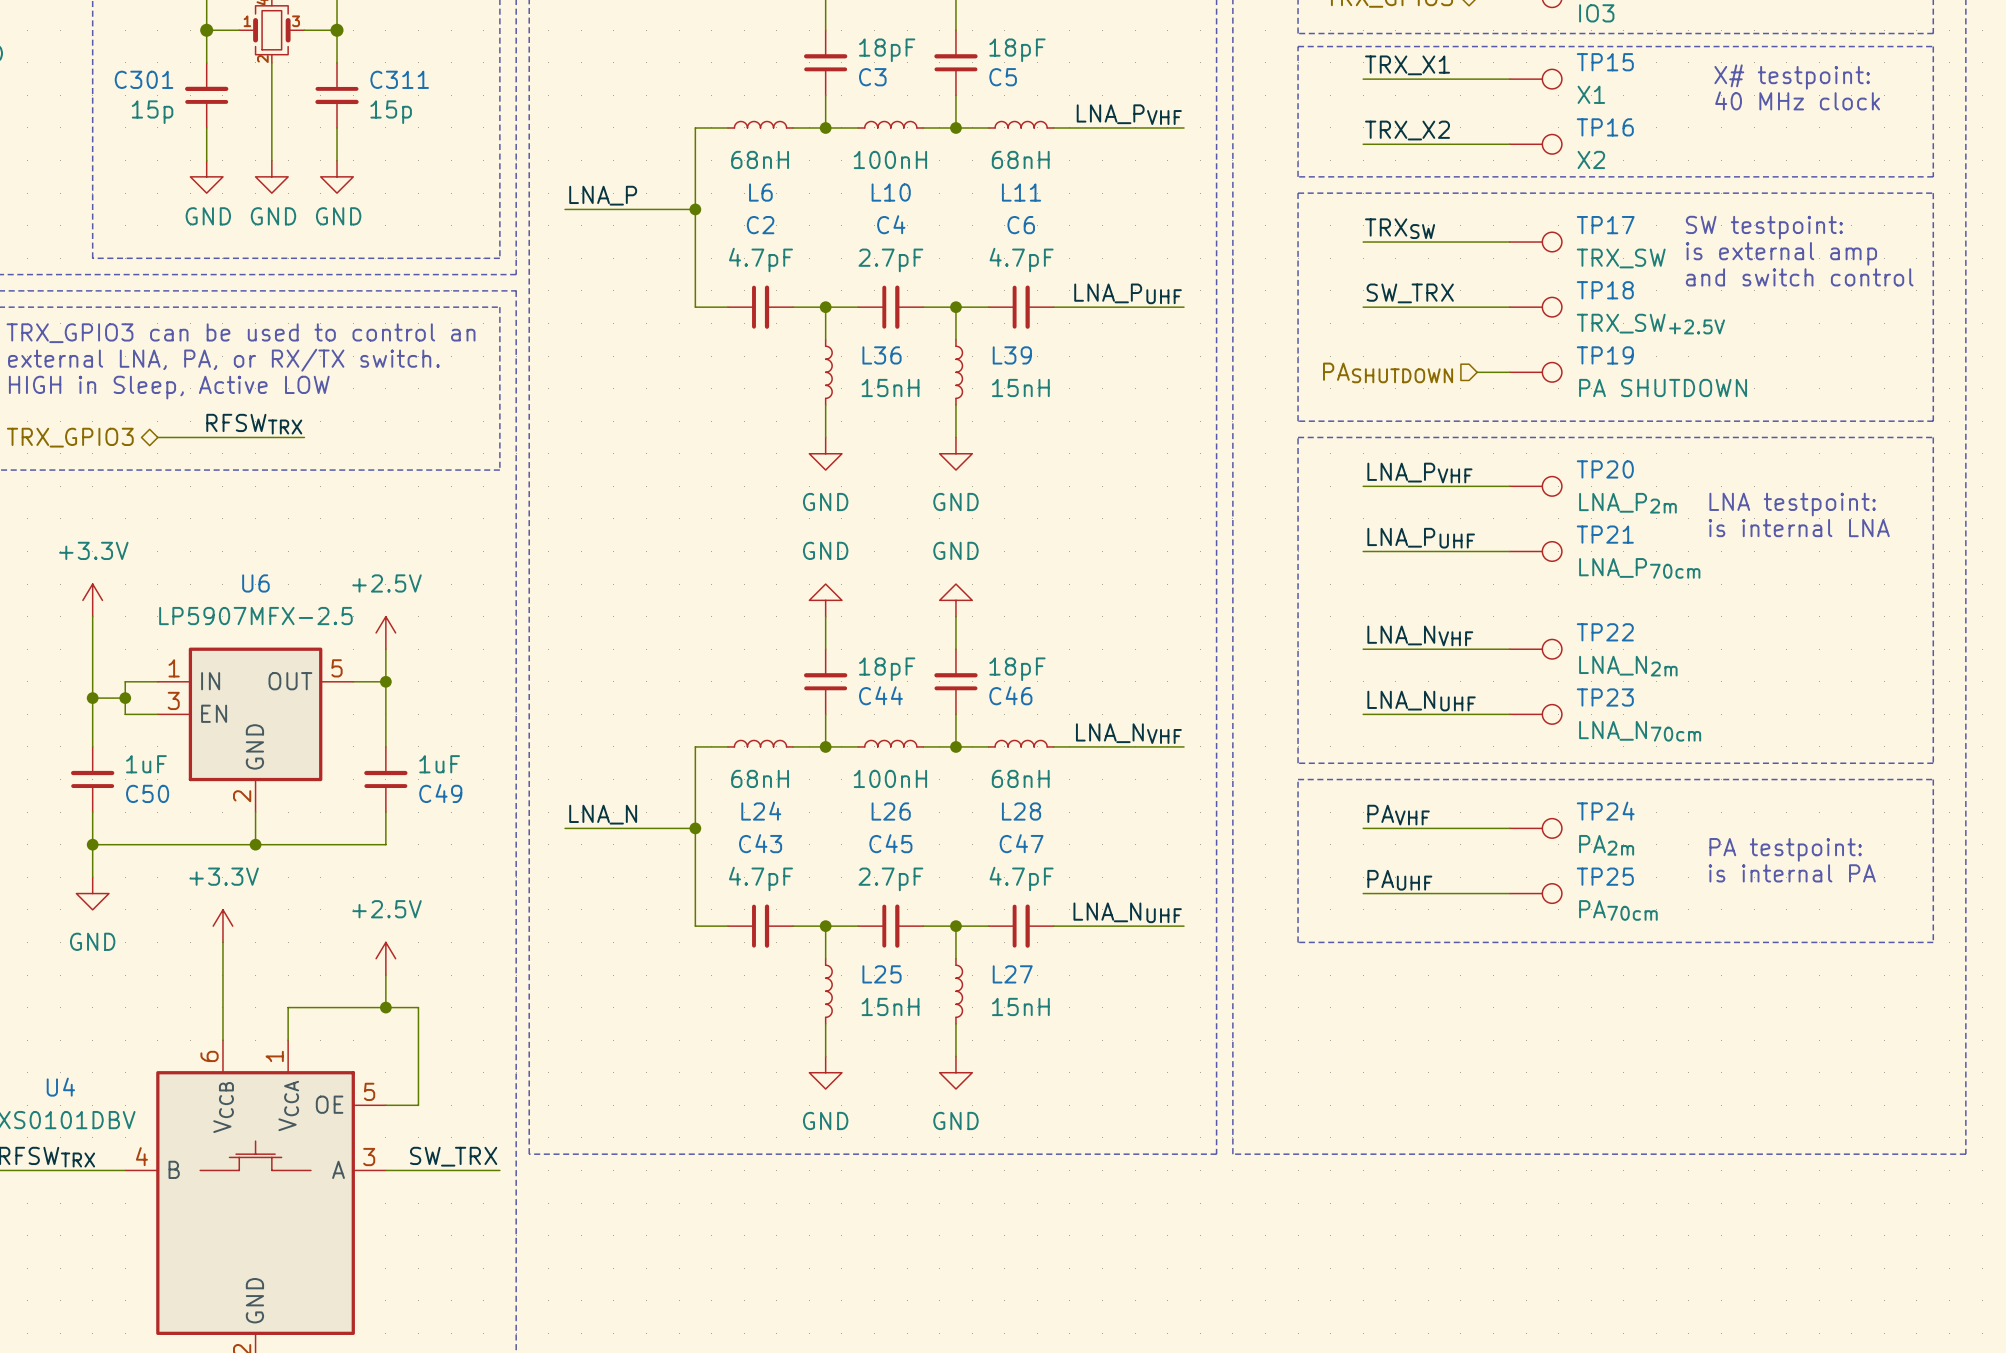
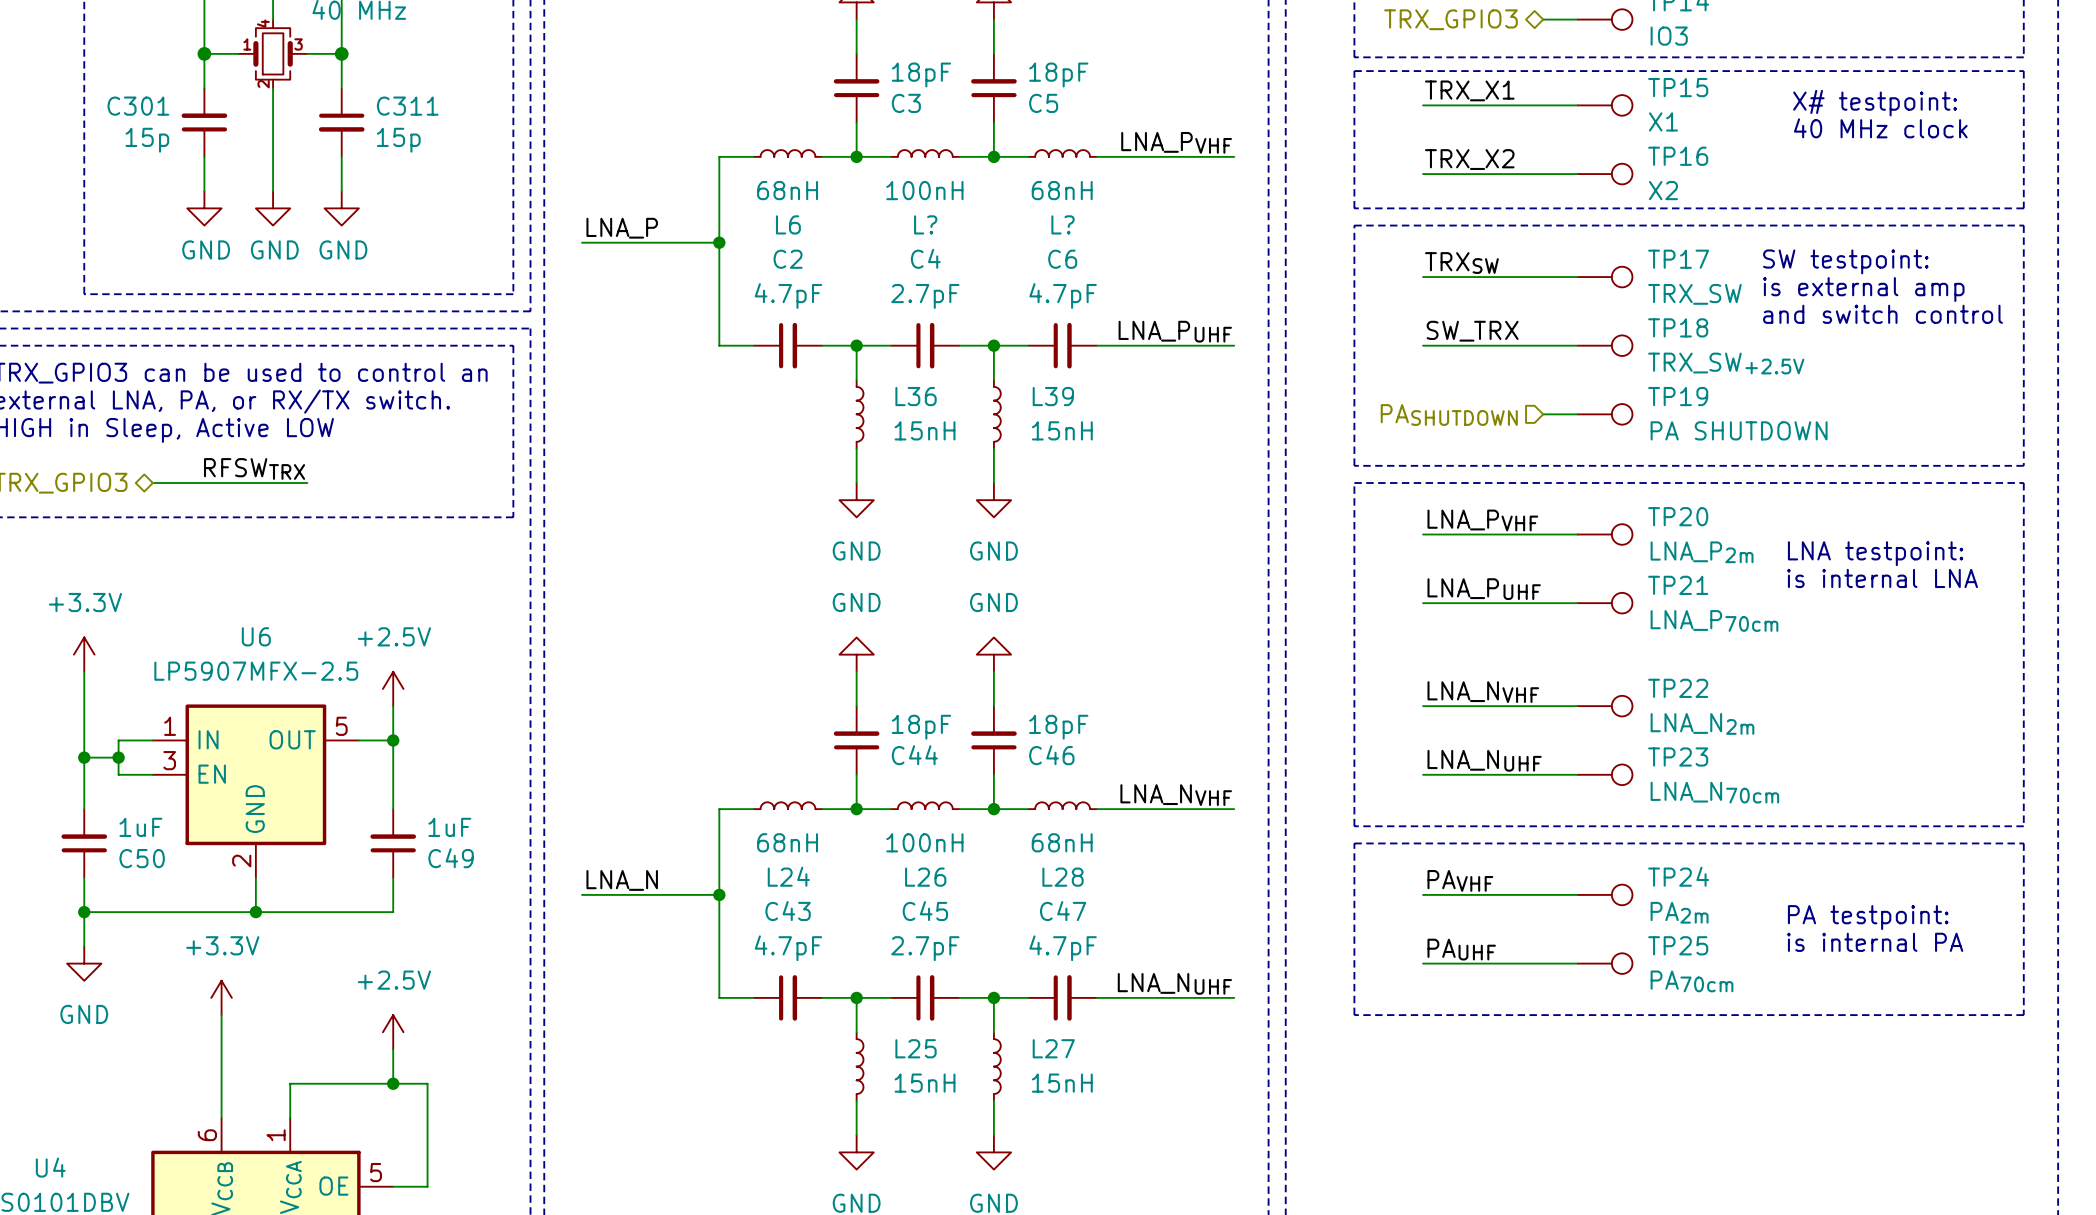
L10 name: L10 (891, 192) -> L? (925, 224)
L11 name: L11 (1021, 192) -> L? (1063, 224)

